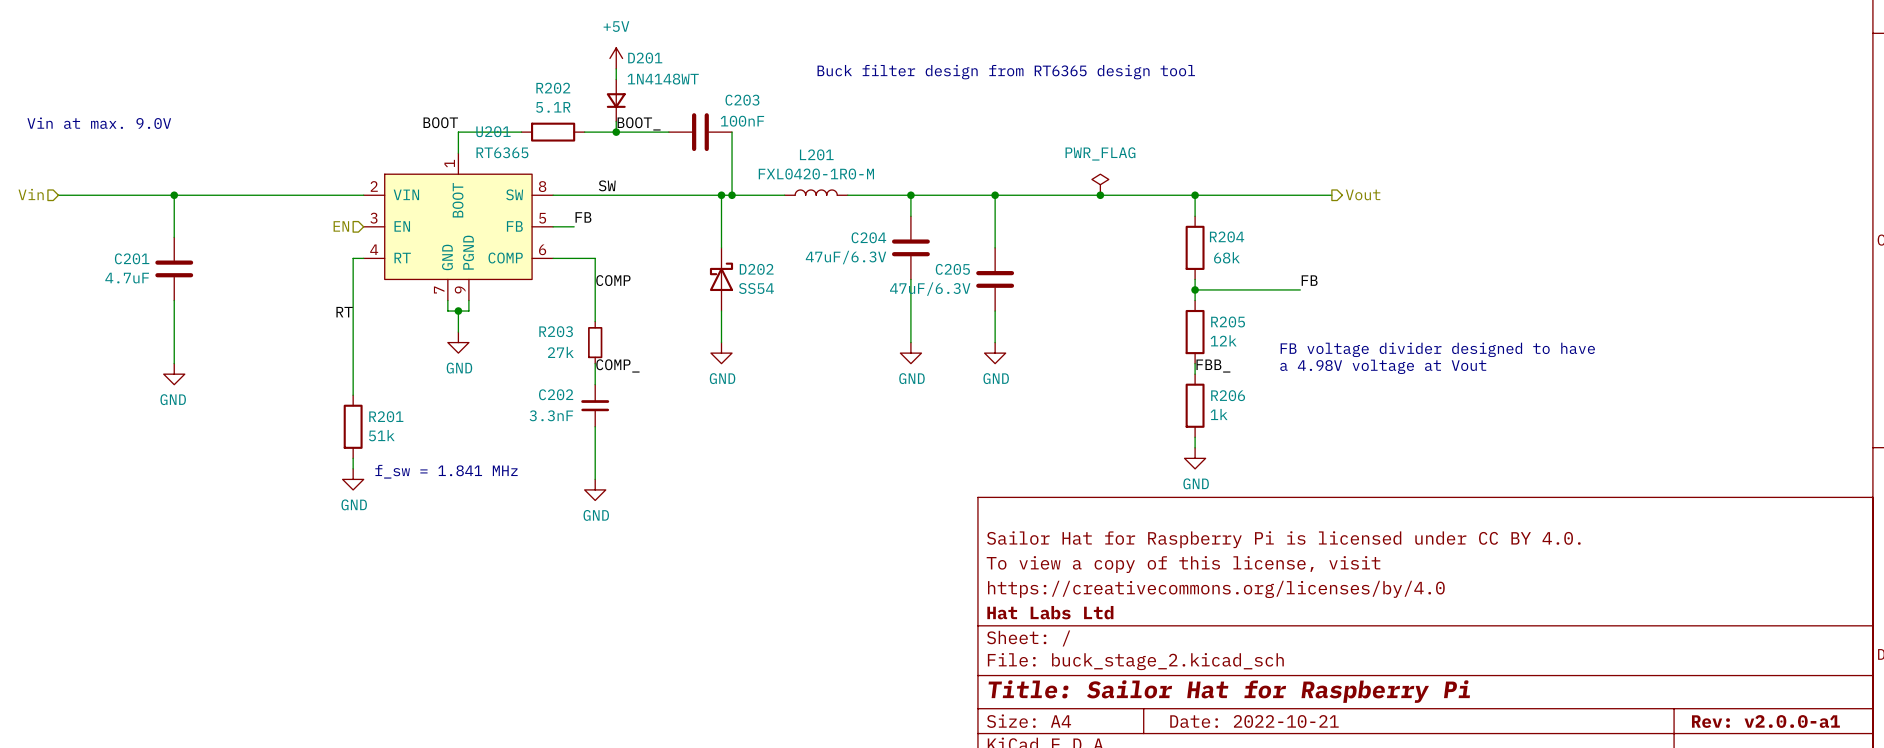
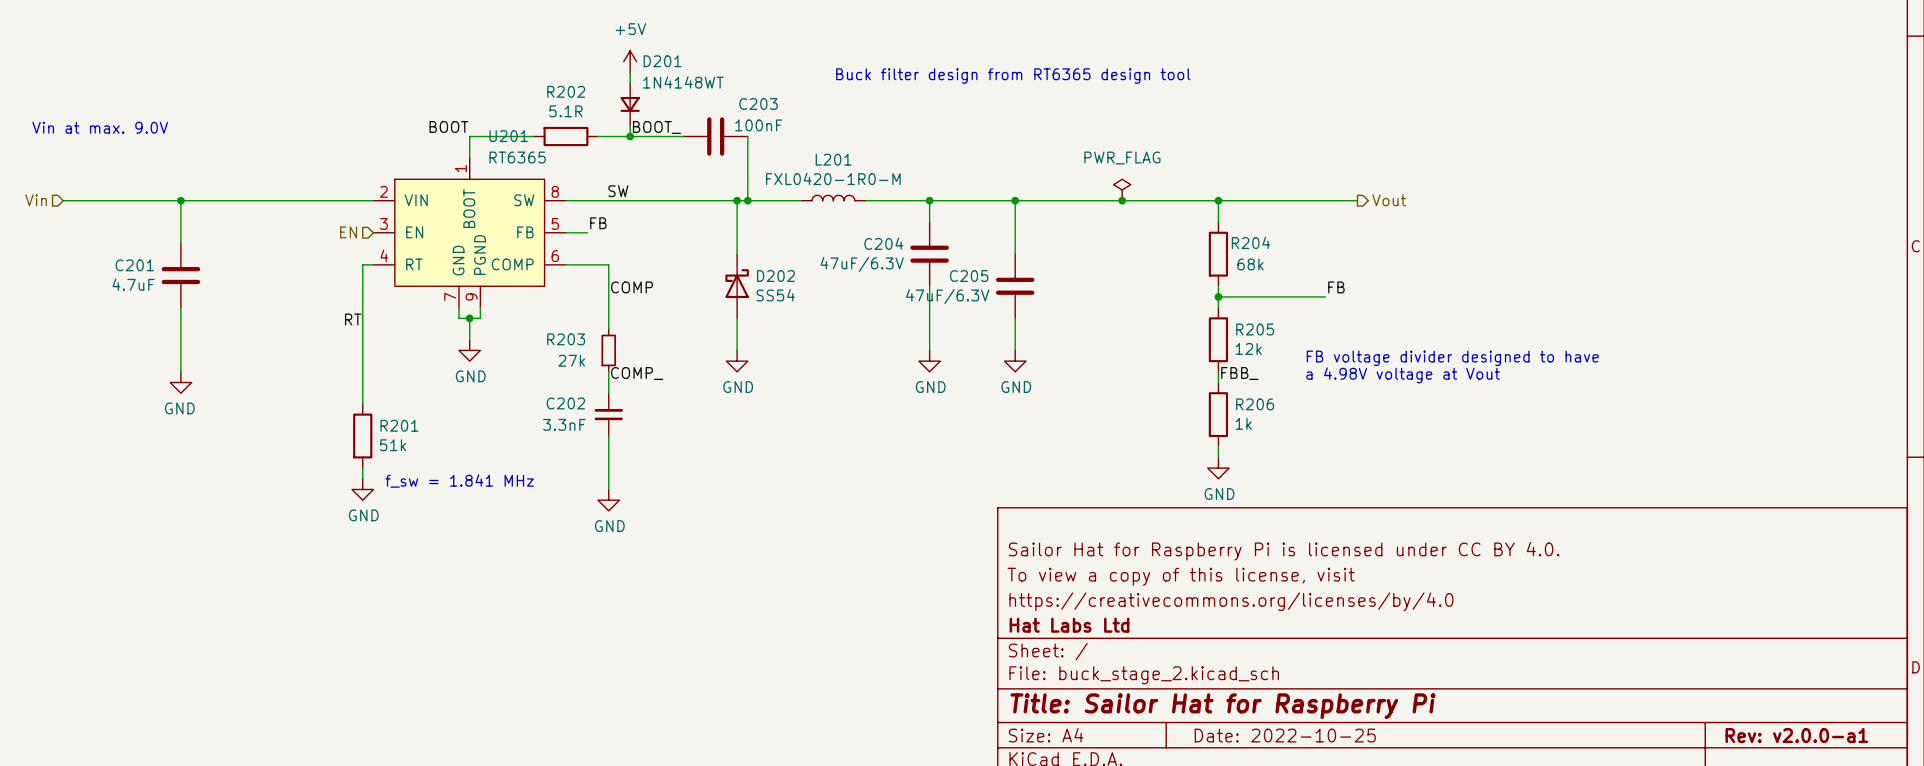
title block: Date: 2022-10-21 (1254, 721) -> Date: 2022-10-25 (1285, 735)

